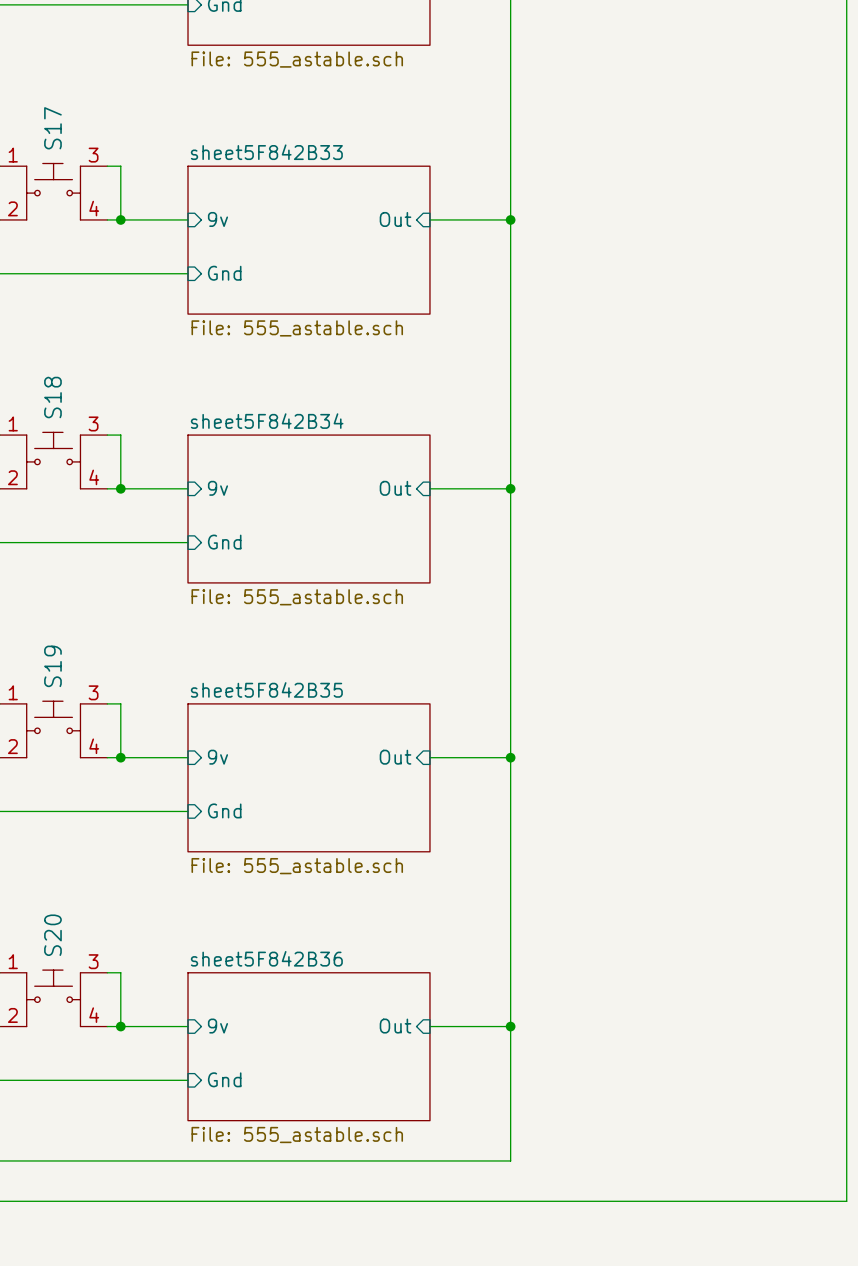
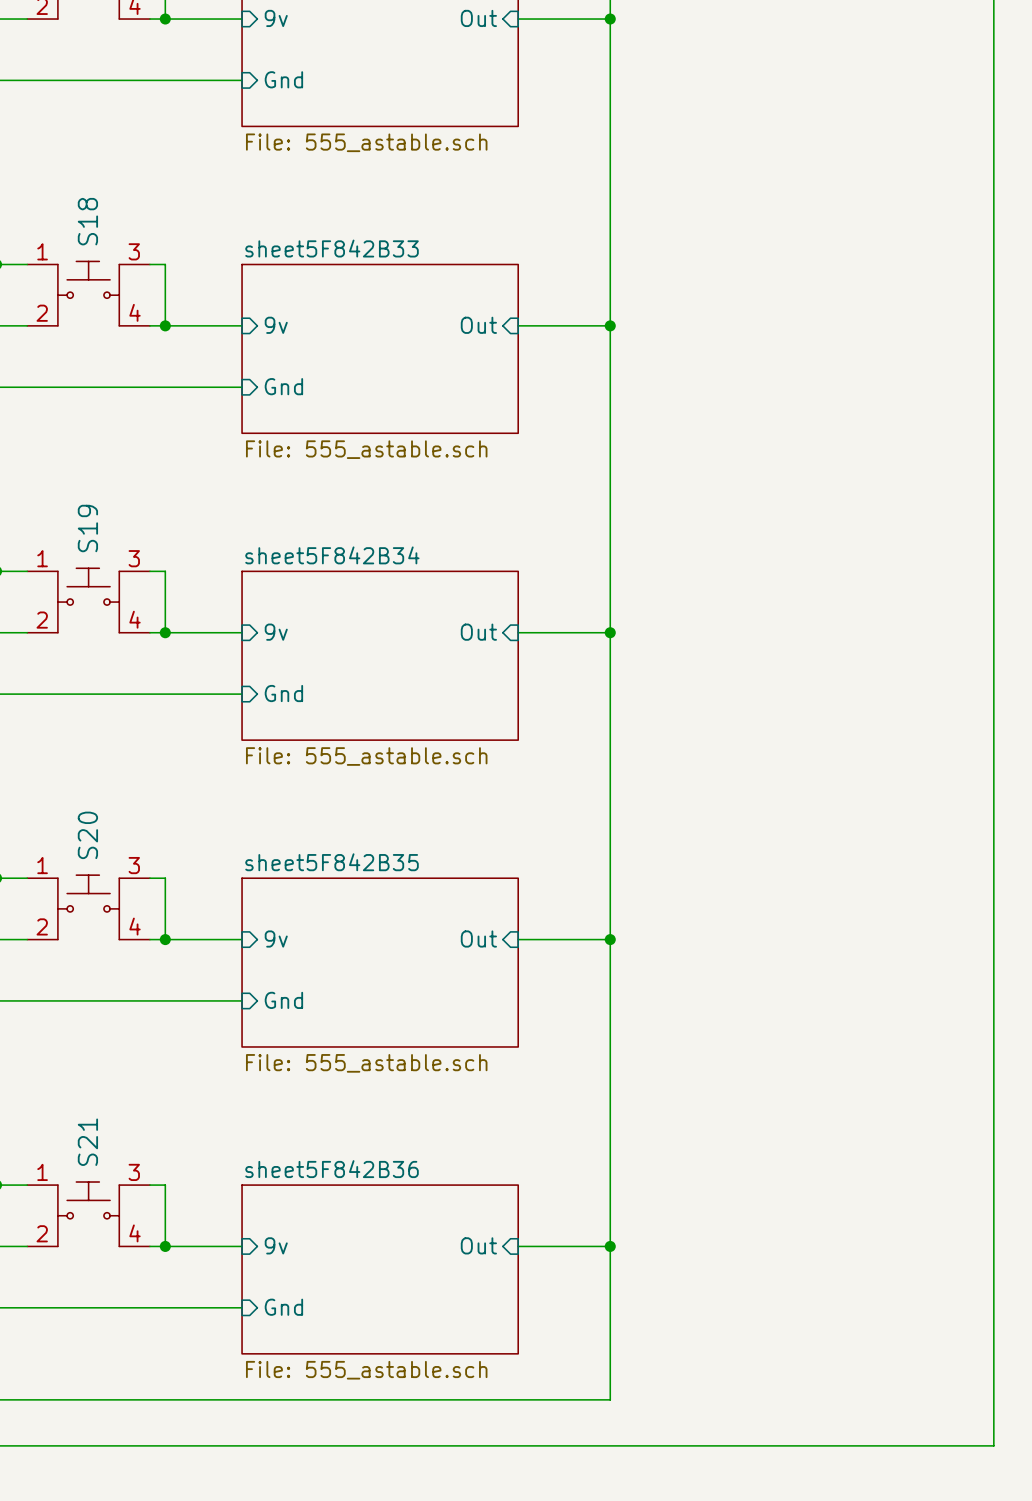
S17 name: S17 (52, 128) -> S18 (87, 221)
S18 name: S18 (52, 397) -> S19 (87, 528)
S19 name: S19 (52, 666) -> S20 (87, 835)
S20 name: S20 (52, 935) -> S21 (87, 1142)

